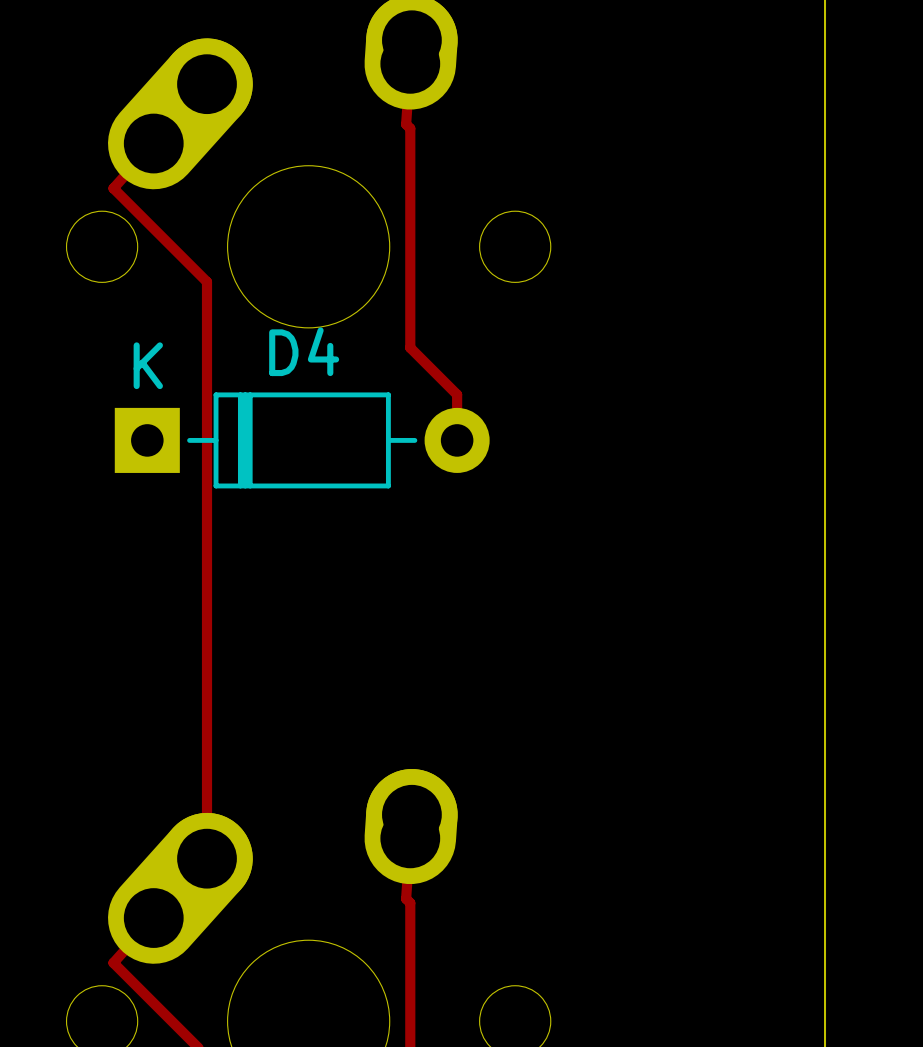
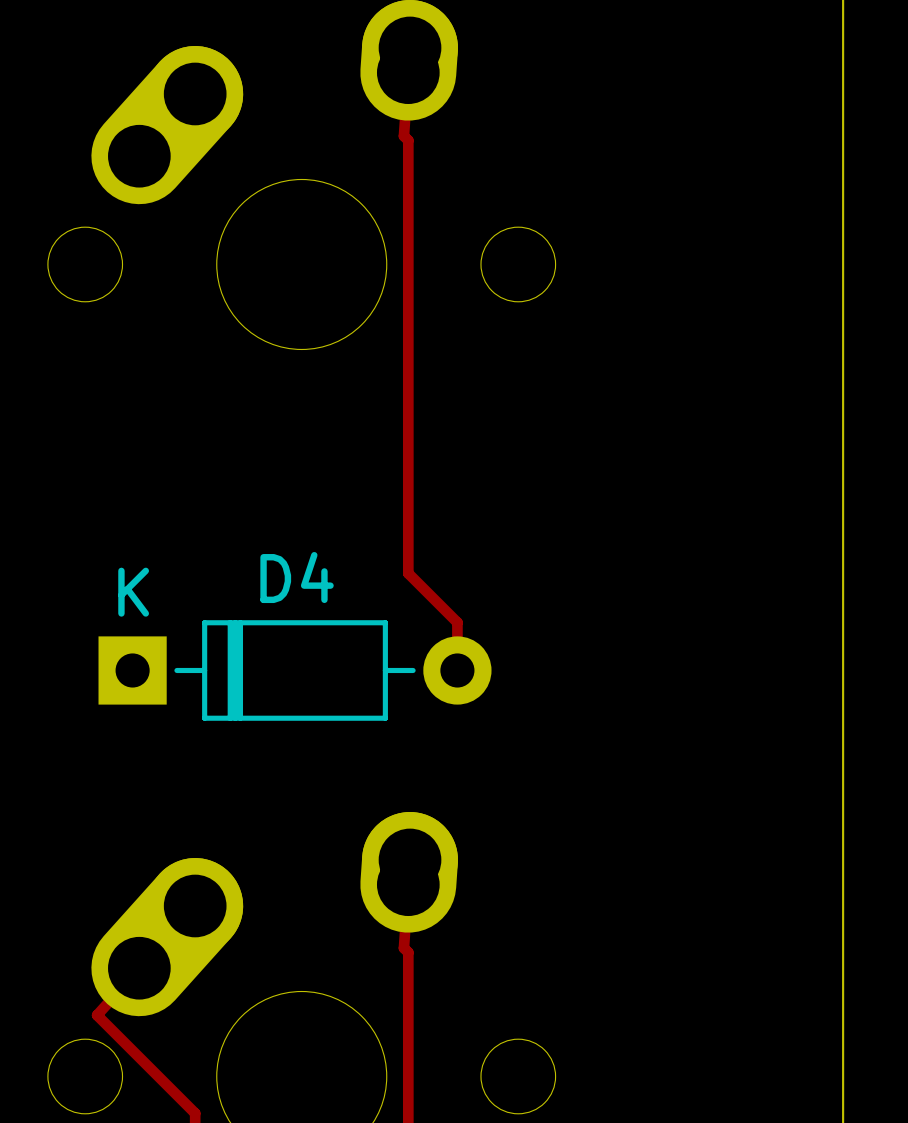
track: (153, 143) (113, 188) (207, 281) (207, 858) -> none
track: (410, 347) (457, 394) (457, 440) -> (408, 370) (408, 573) (457, 622) (457, 670)
D4 position: (302, 440) -> (295, 670)

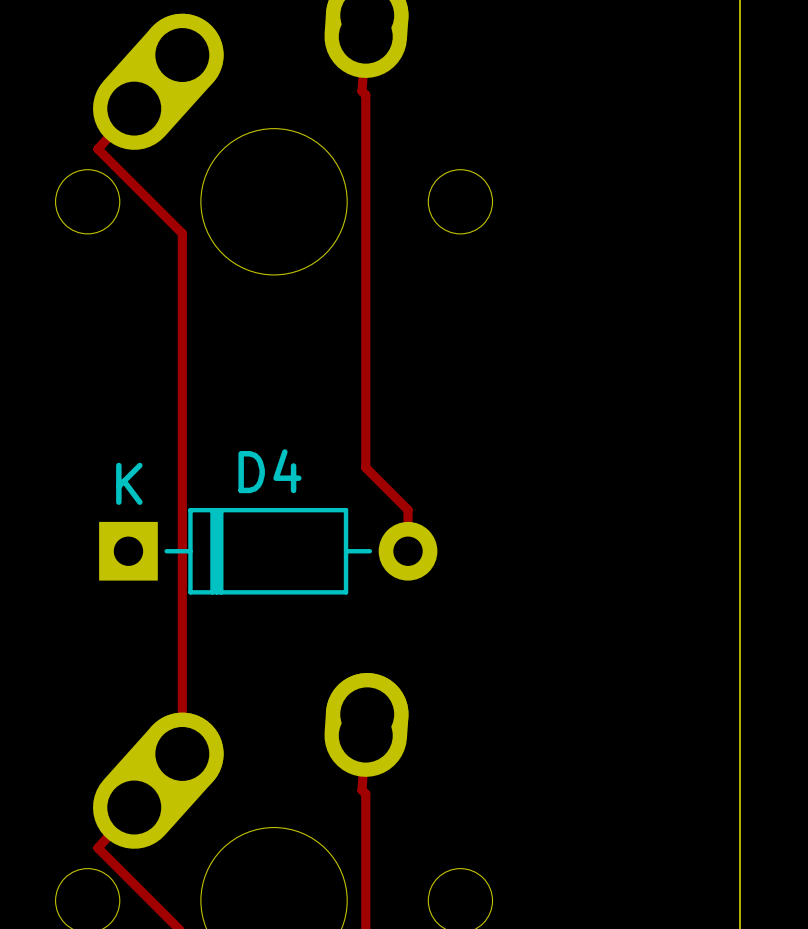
track: none -> (134, 108) (97, 149) (182, 233) (182, 753)

